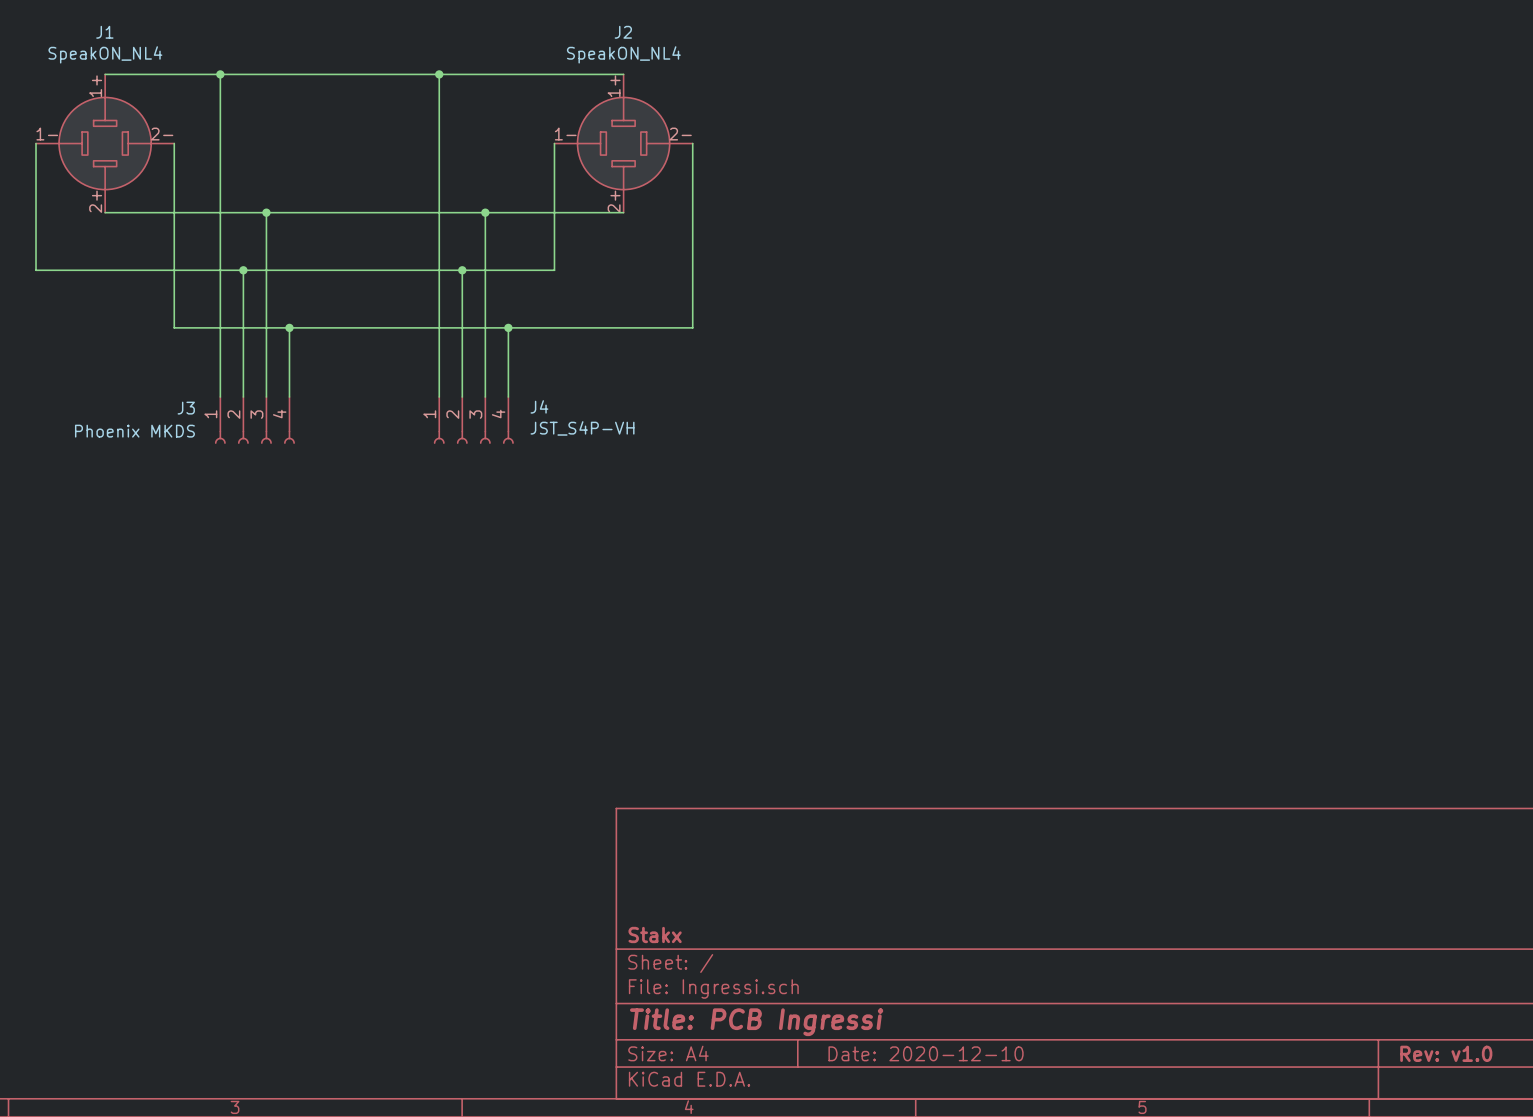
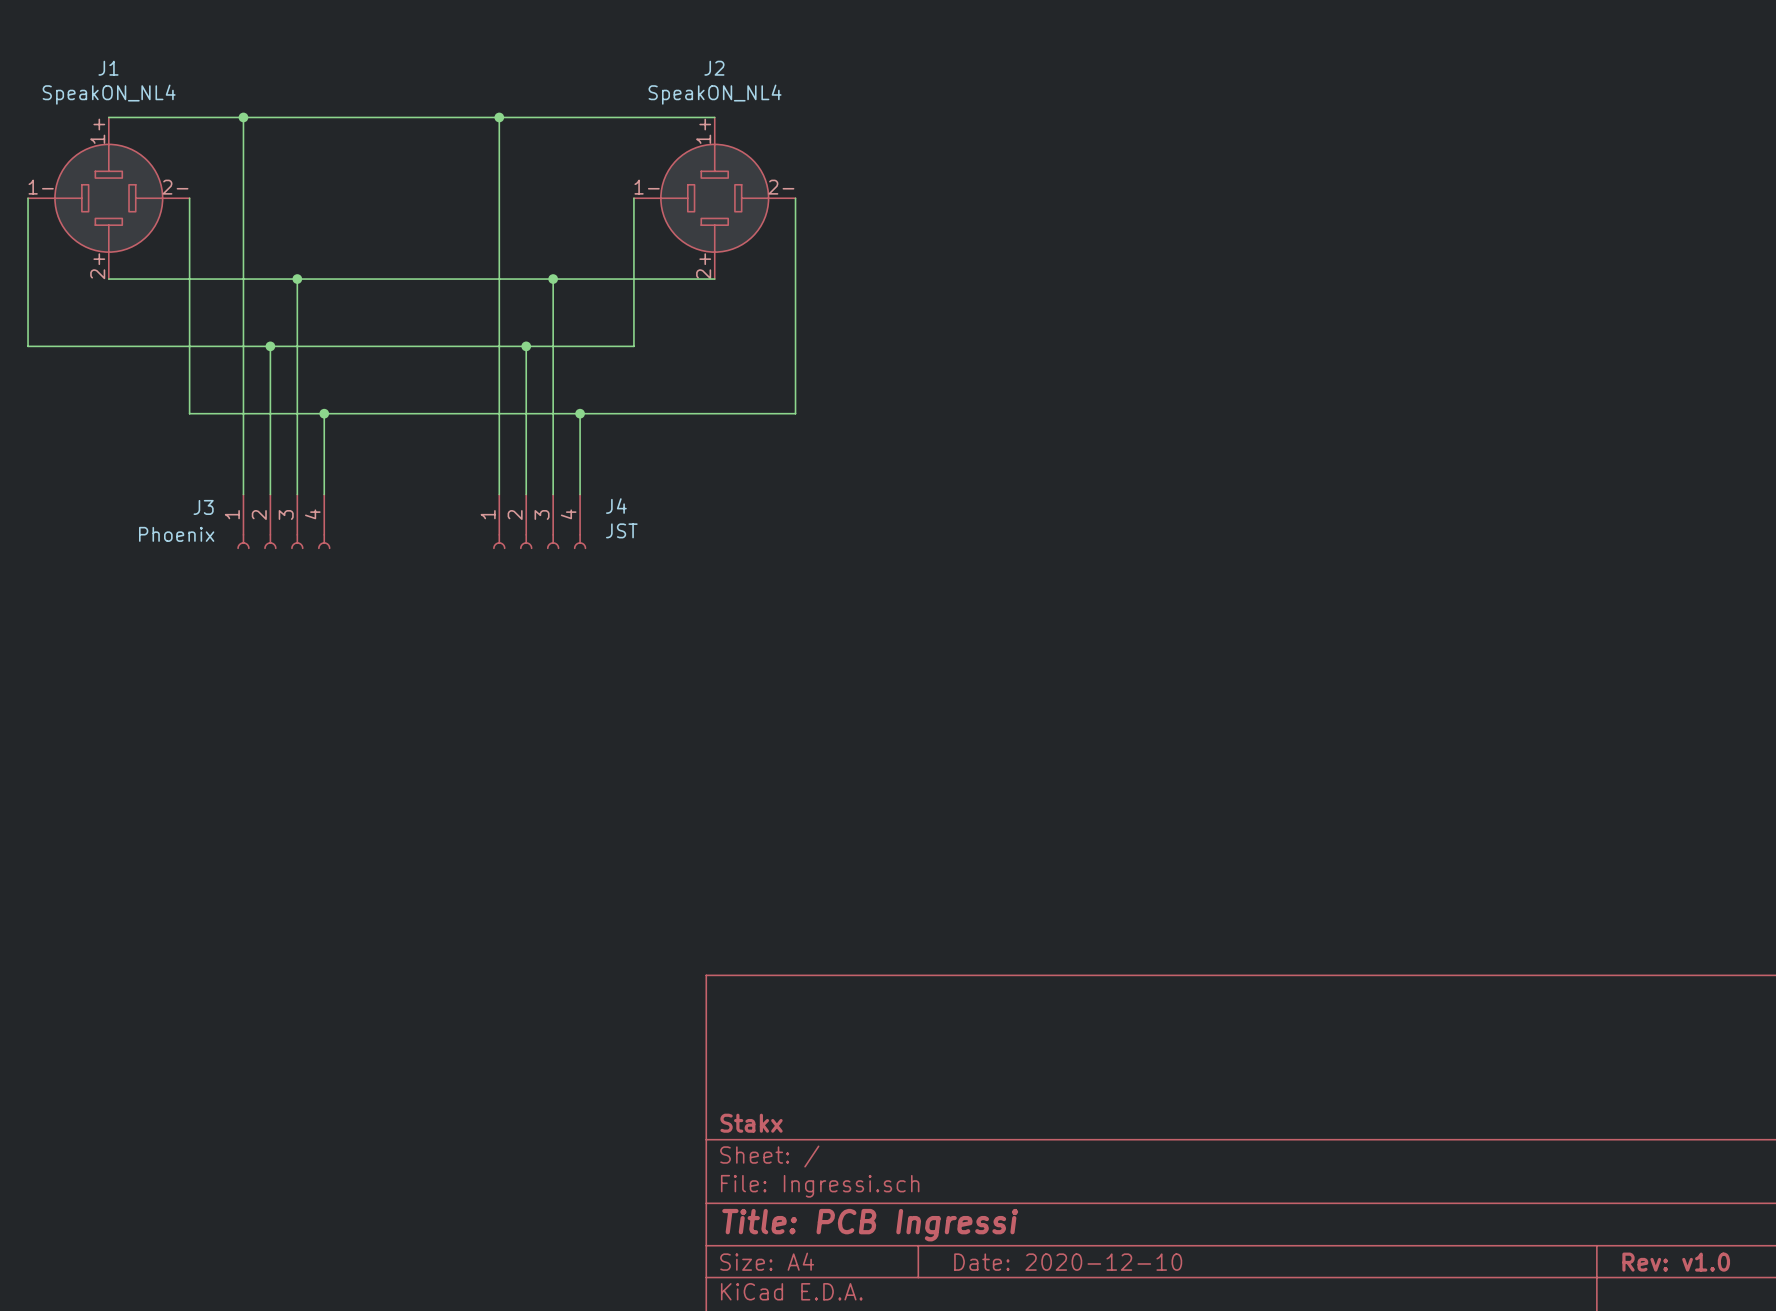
J4 value: JST_S4P-VH (582, 428) -> JST (621, 530)
J3 value: Phoenix MKDS (134, 431) -> Phoenix (176, 534)

